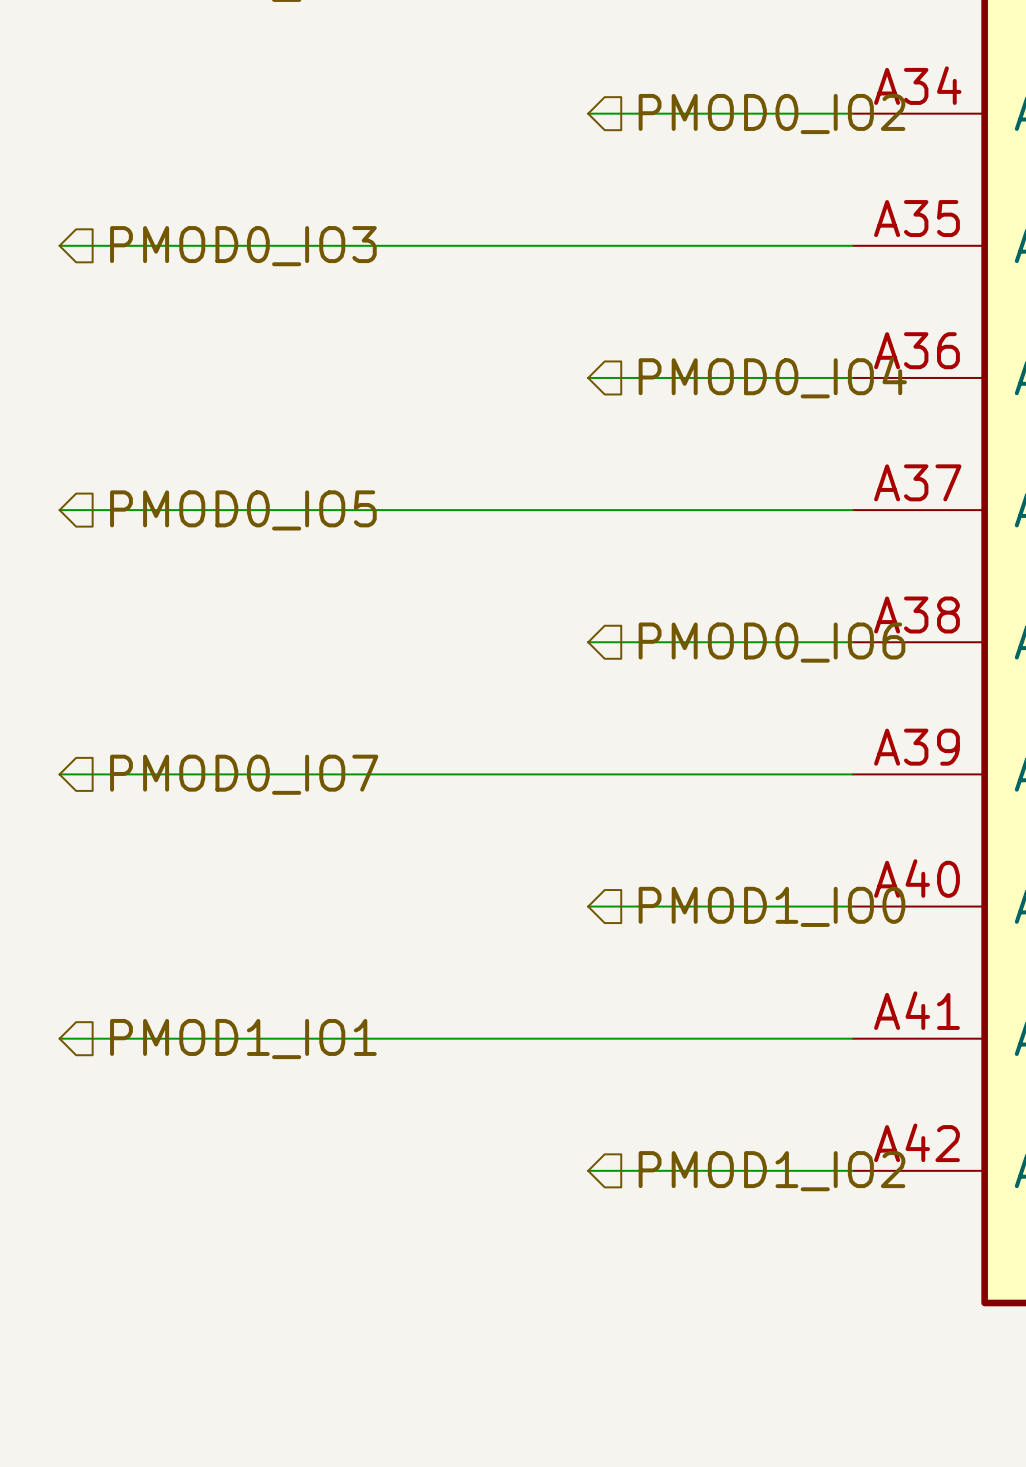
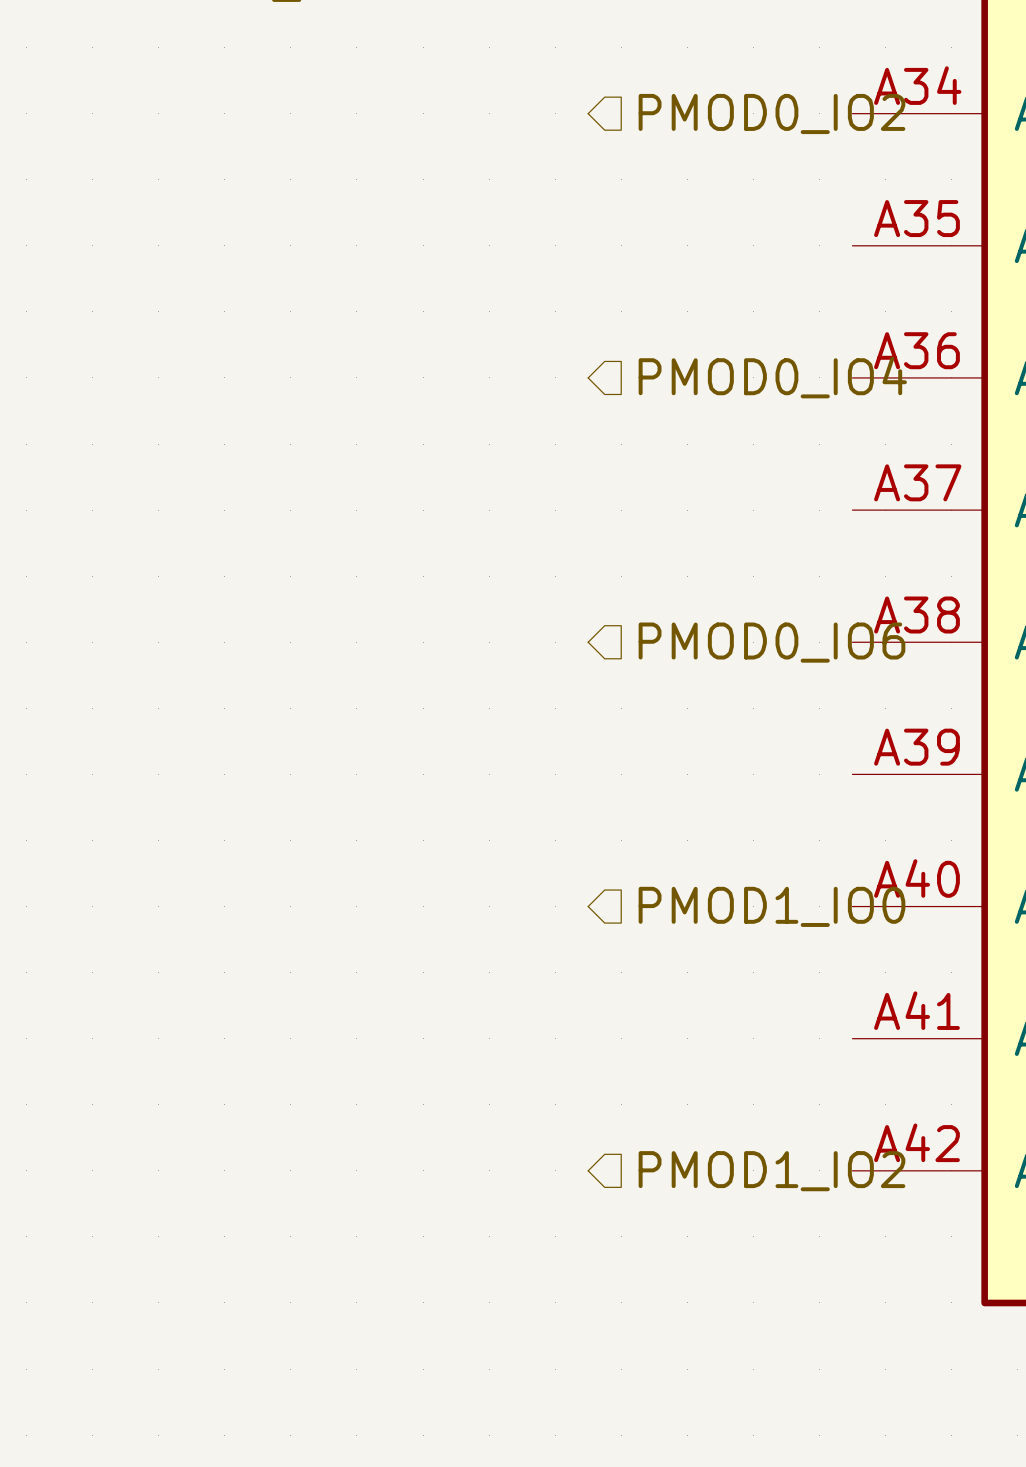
wire: (588, 113) (852, 113) -> none
wire: (59, 245) (852, 245) -> none
hierarchical label: PMOD0_IO3 (243, 246) -> none
wire: (588, 377) (852, 377) -> none
wire: (59, 510) (852, 510) -> none
hierarchical label: PMOD0_IO5 (243, 510) -> none
wire: (588, 642) (852, 642) -> none
wire: (59, 774) (852, 774) -> none
hierarchical label: PMOD0_IO7 (244, 774) -> none
wire: (588, 906) (852, 906) -> none
wire: (59, 1038) (852, 1038) -> none
hierarchical label: PMOD1_IO1 (243, 1039) -> none
wire: (588, 1170) (852, 1170) -> none

